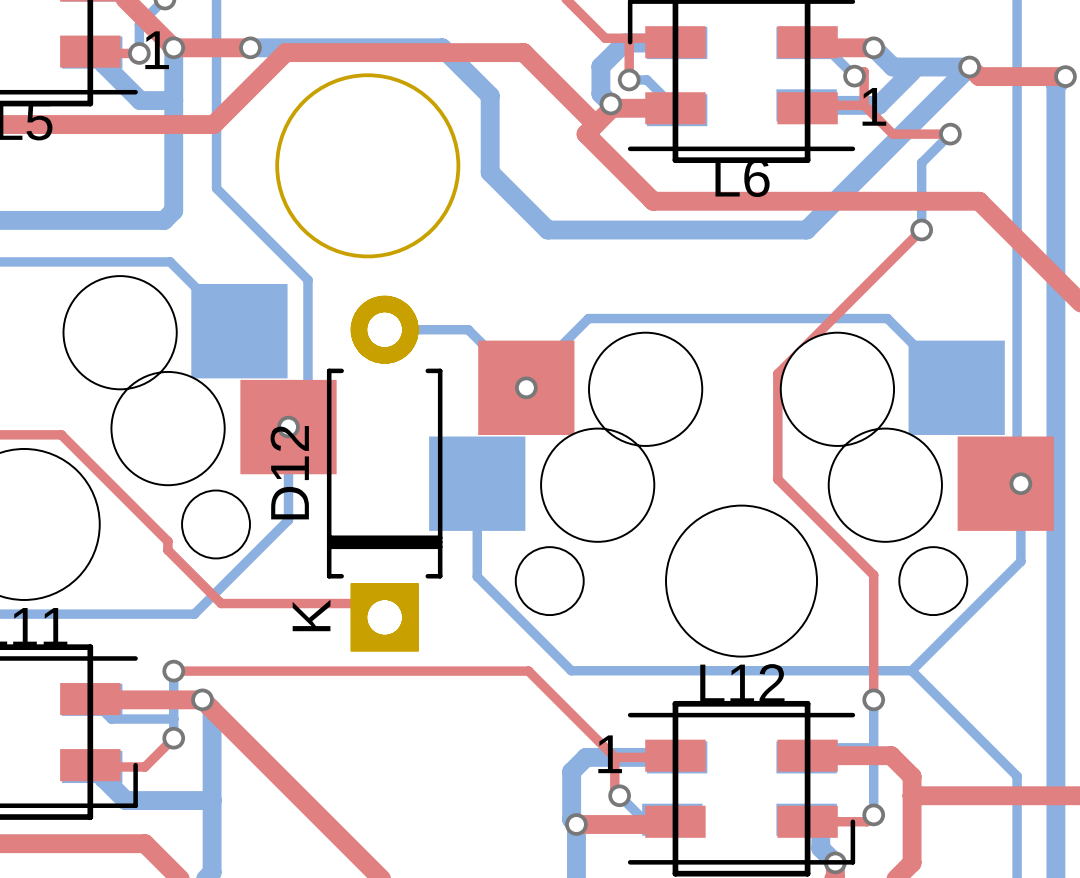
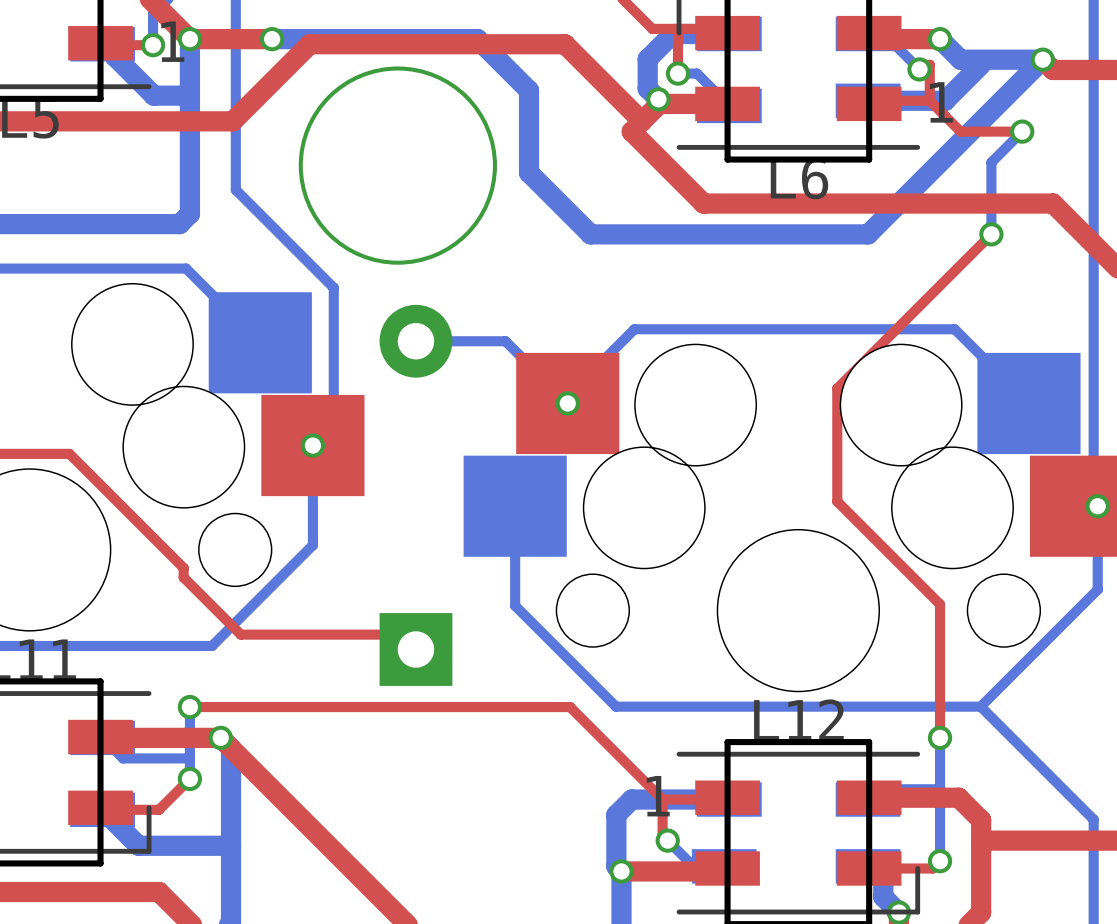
D12: (384, 473) -> none

